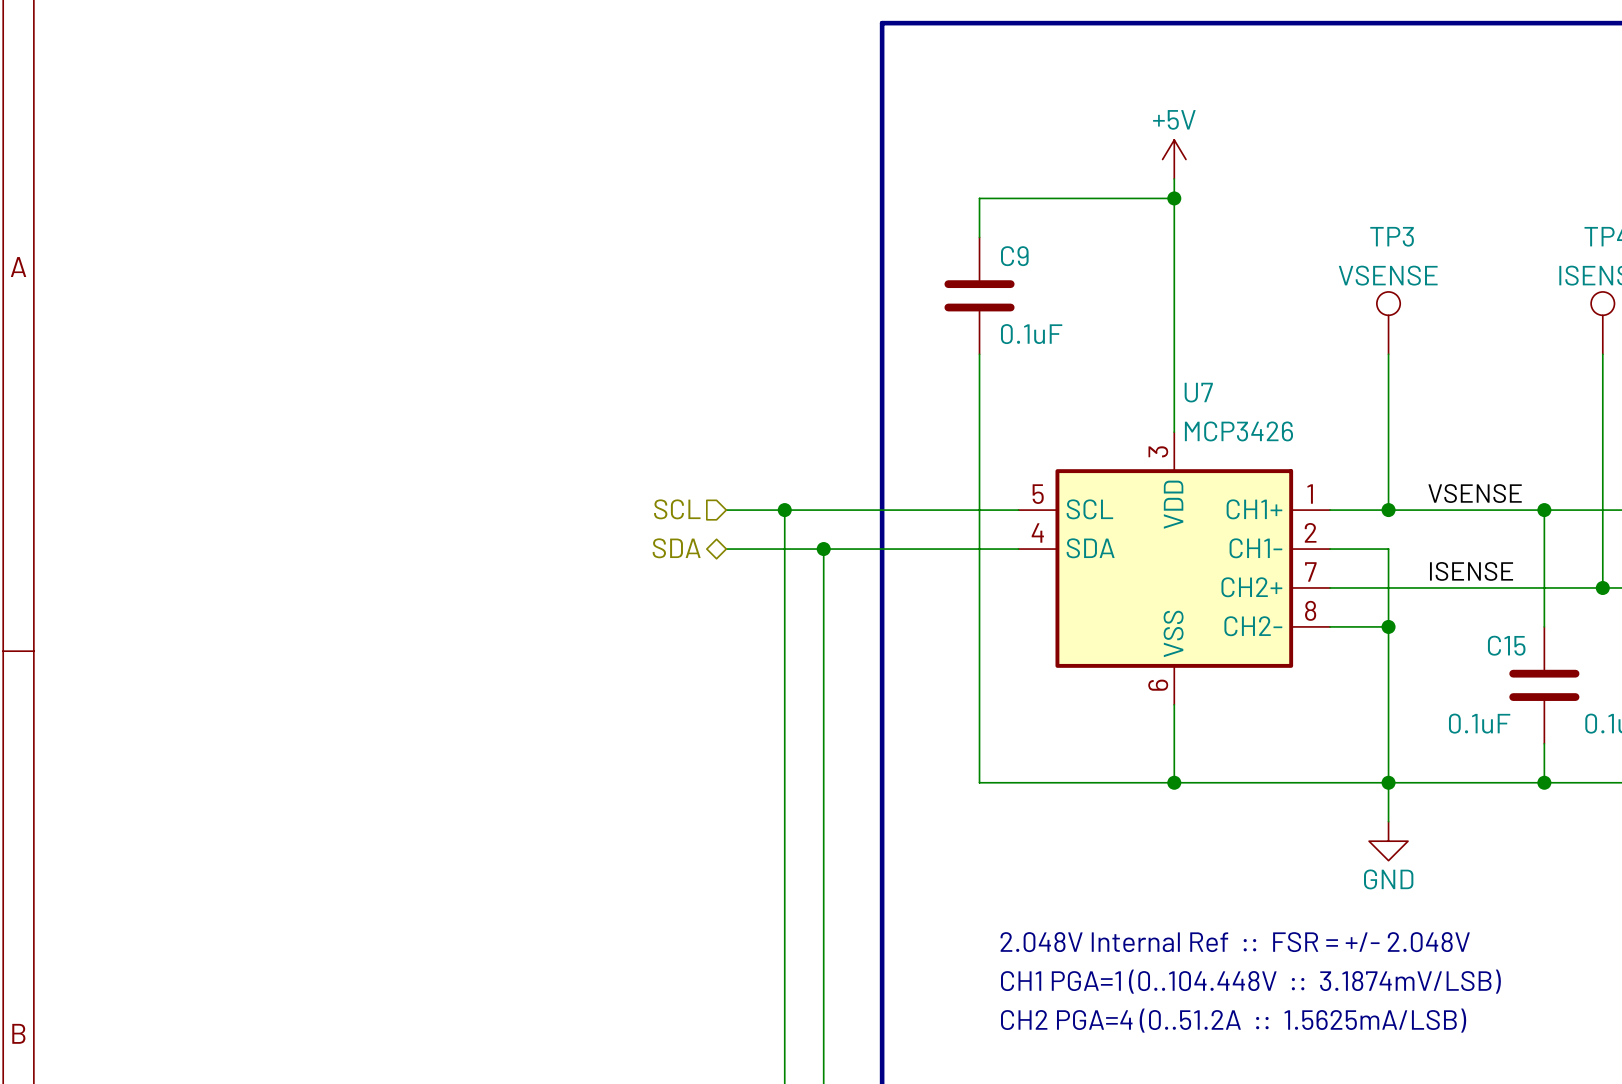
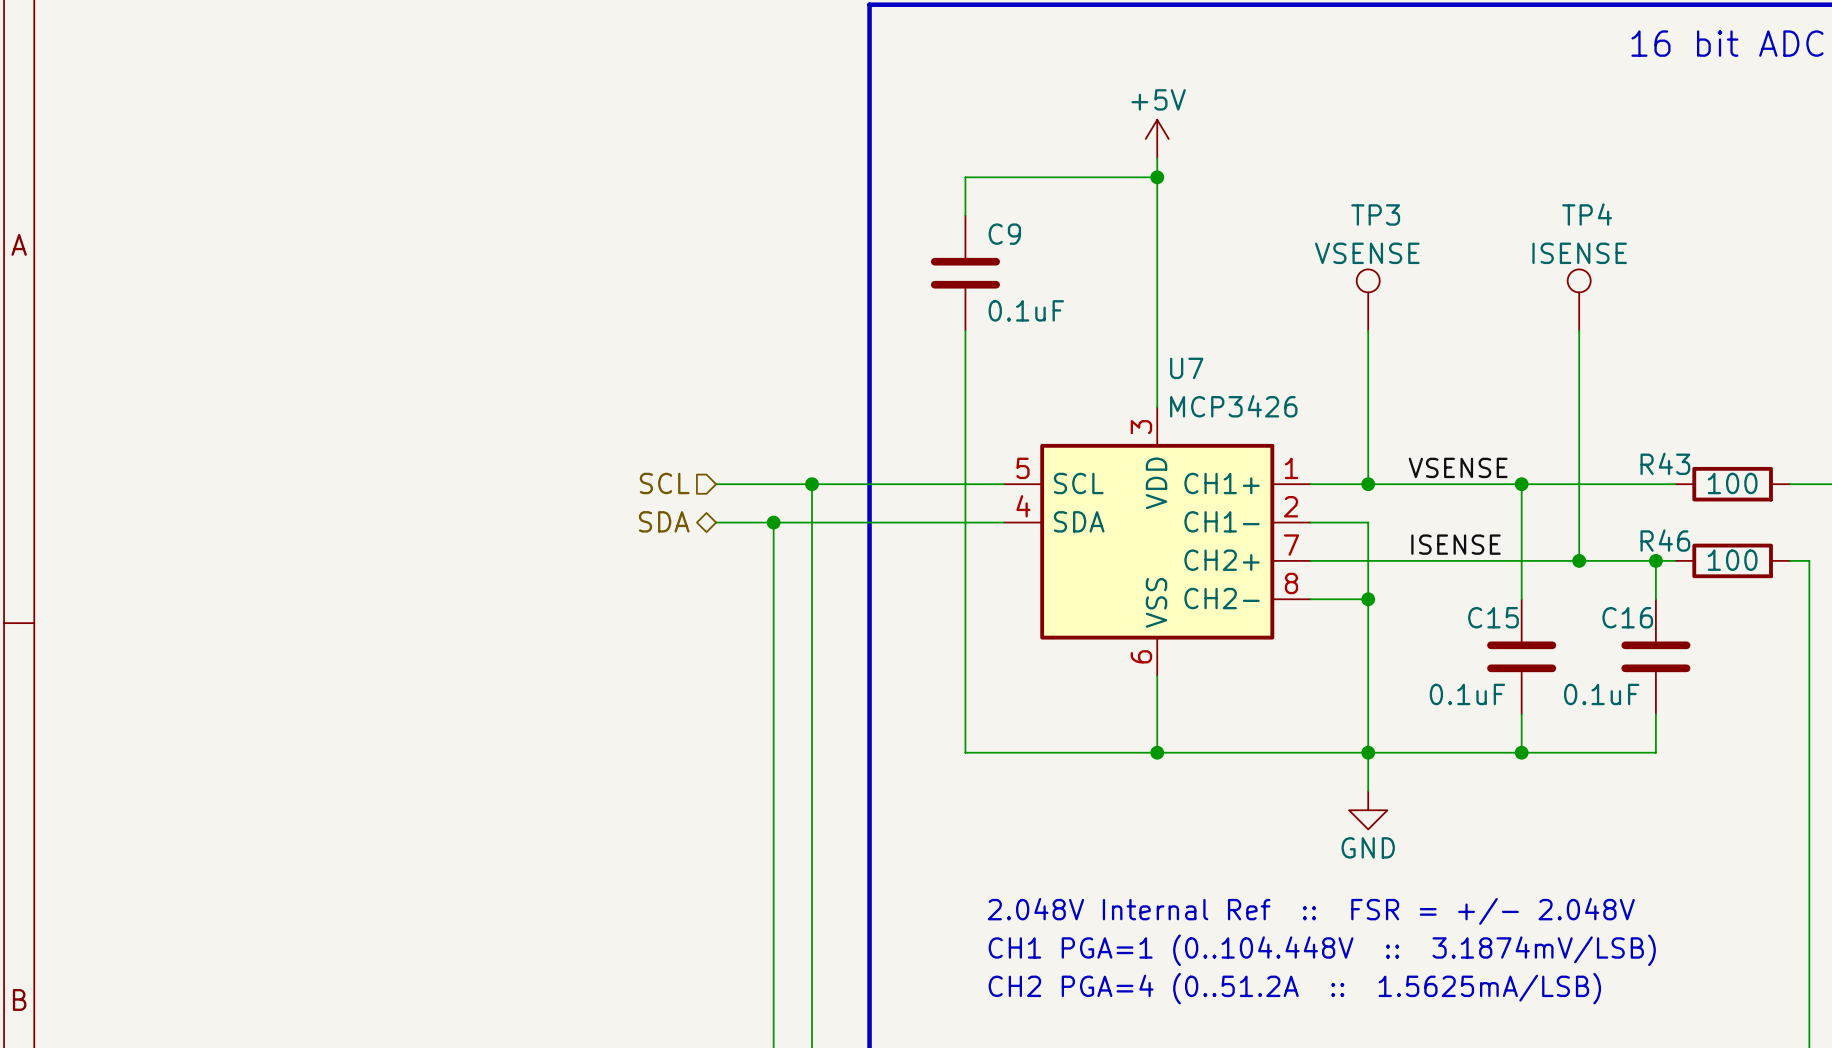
wire: (784, 510) (784, 549) -> (812, 484) (812, 522)
junction: (784, 510) -> none
junction: none -> (812, 484)
junction: none -> (773, 522)
junction: (823, 549) -> none

